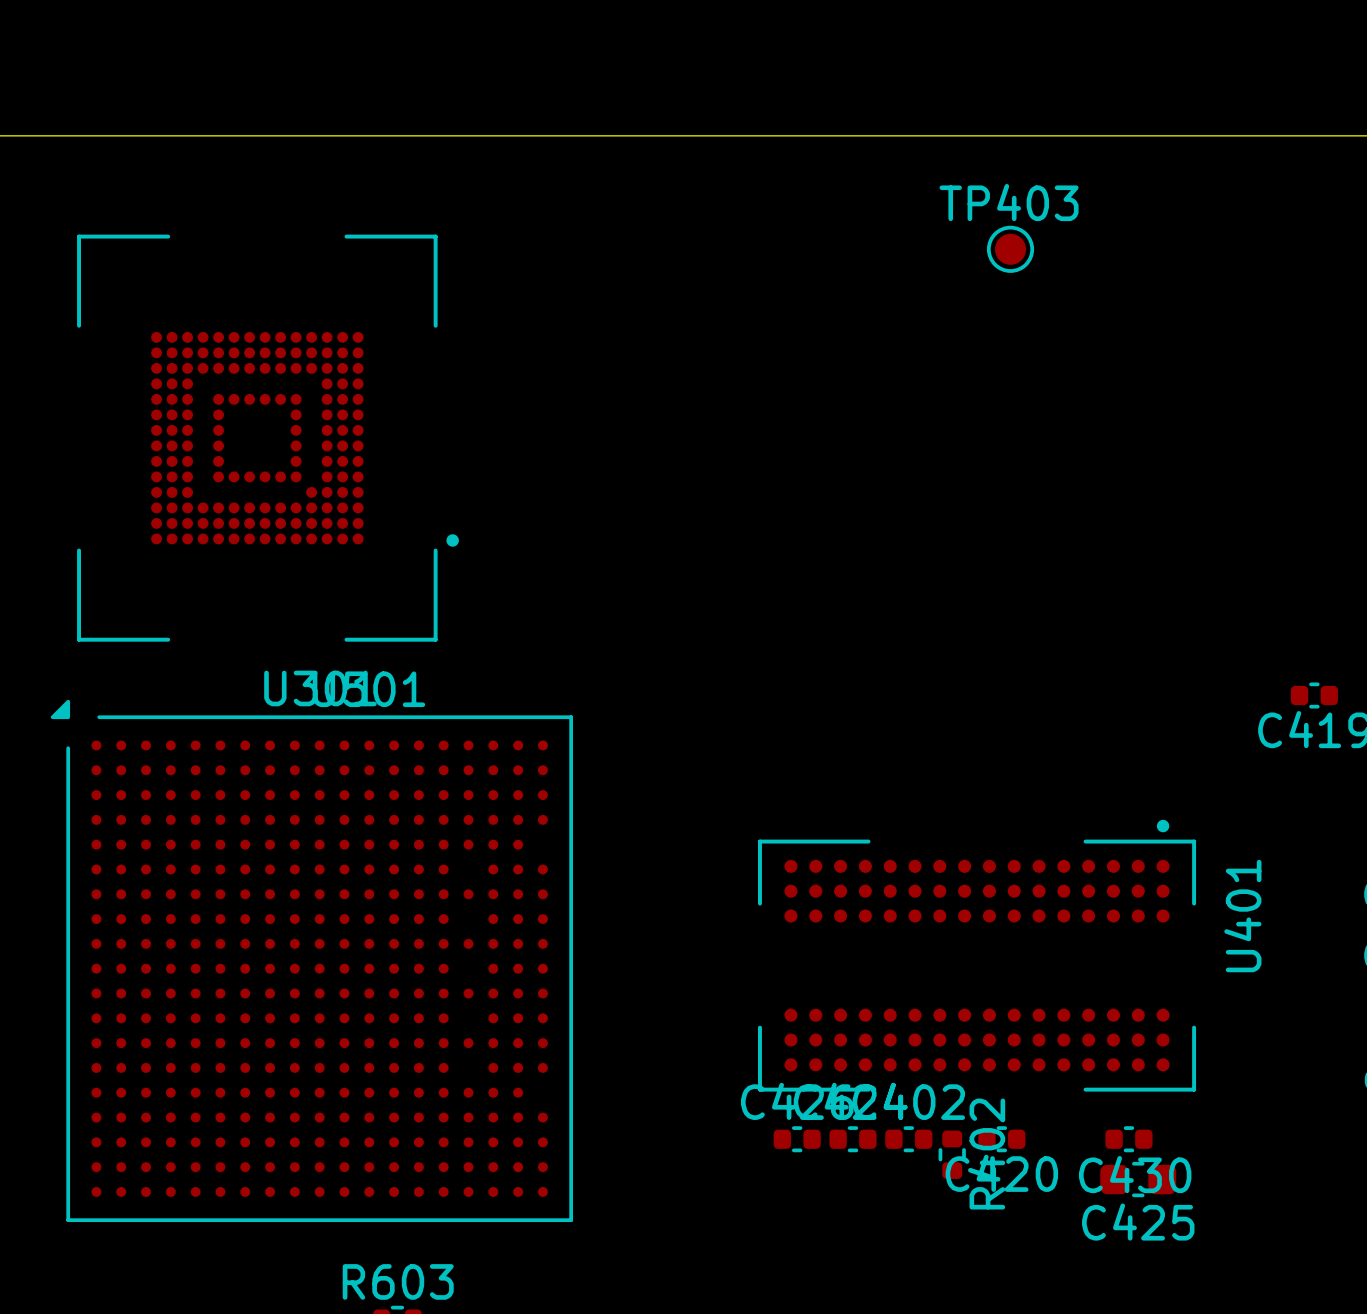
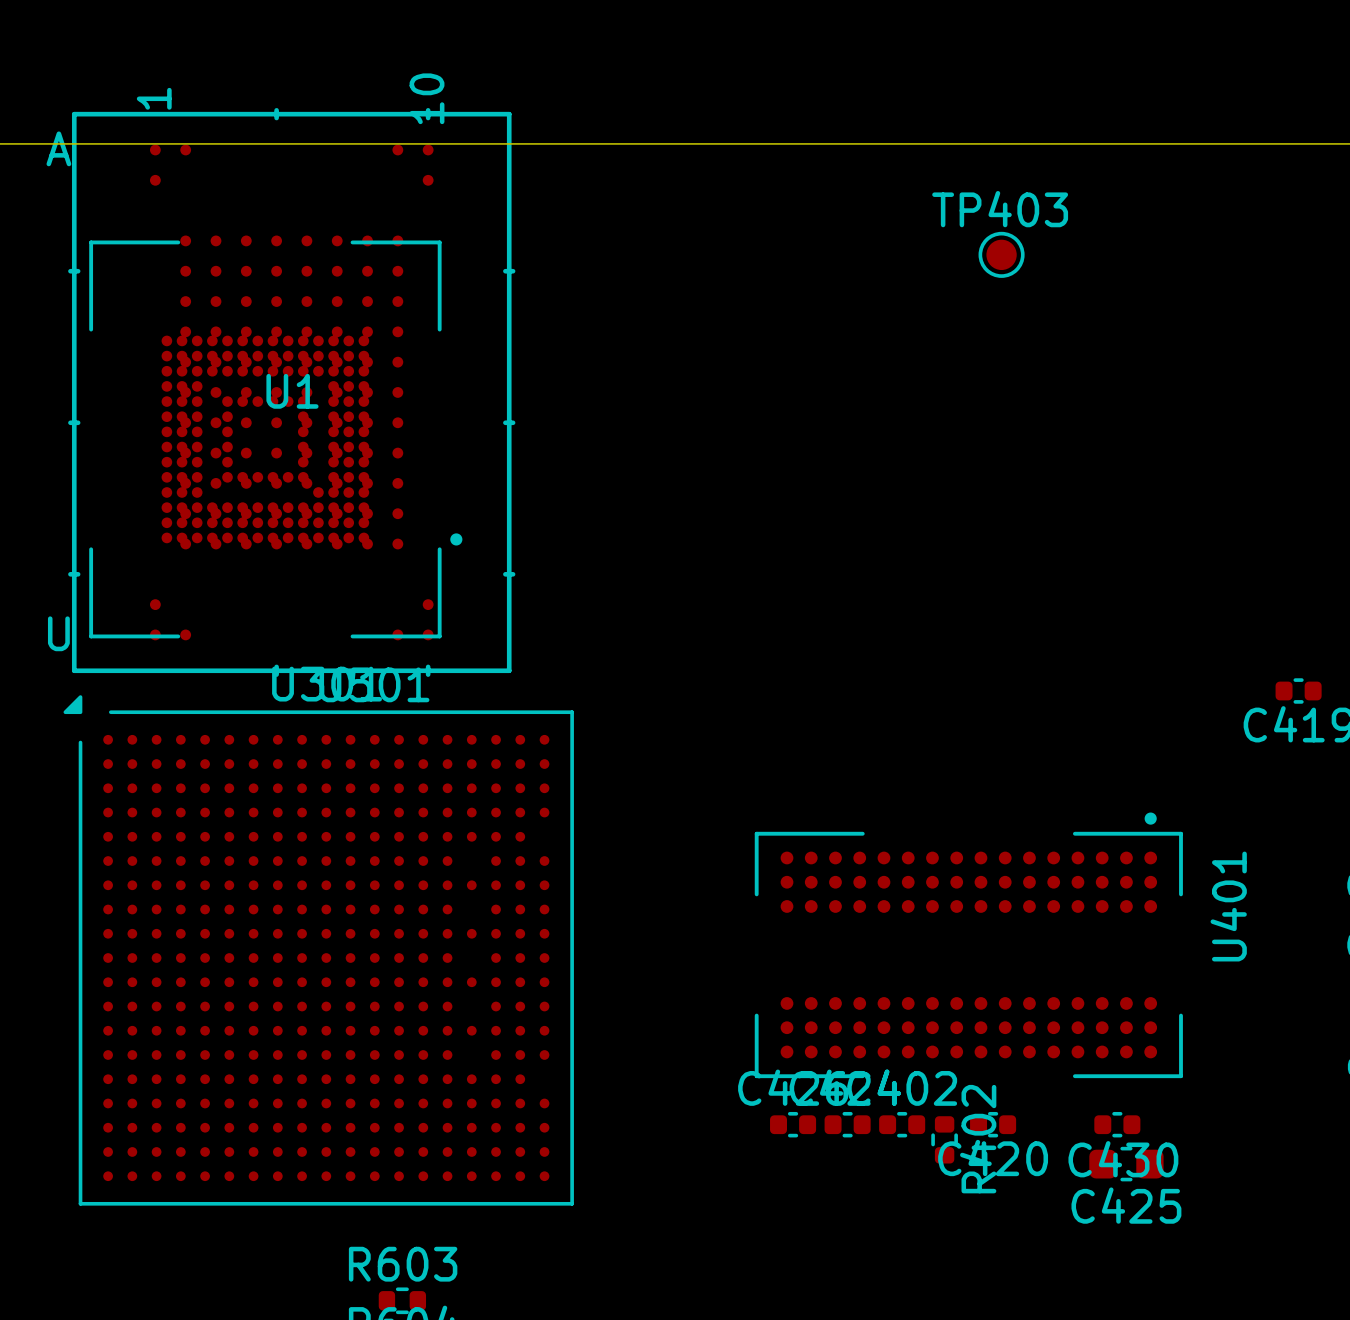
U1: none -> (291, 392)

